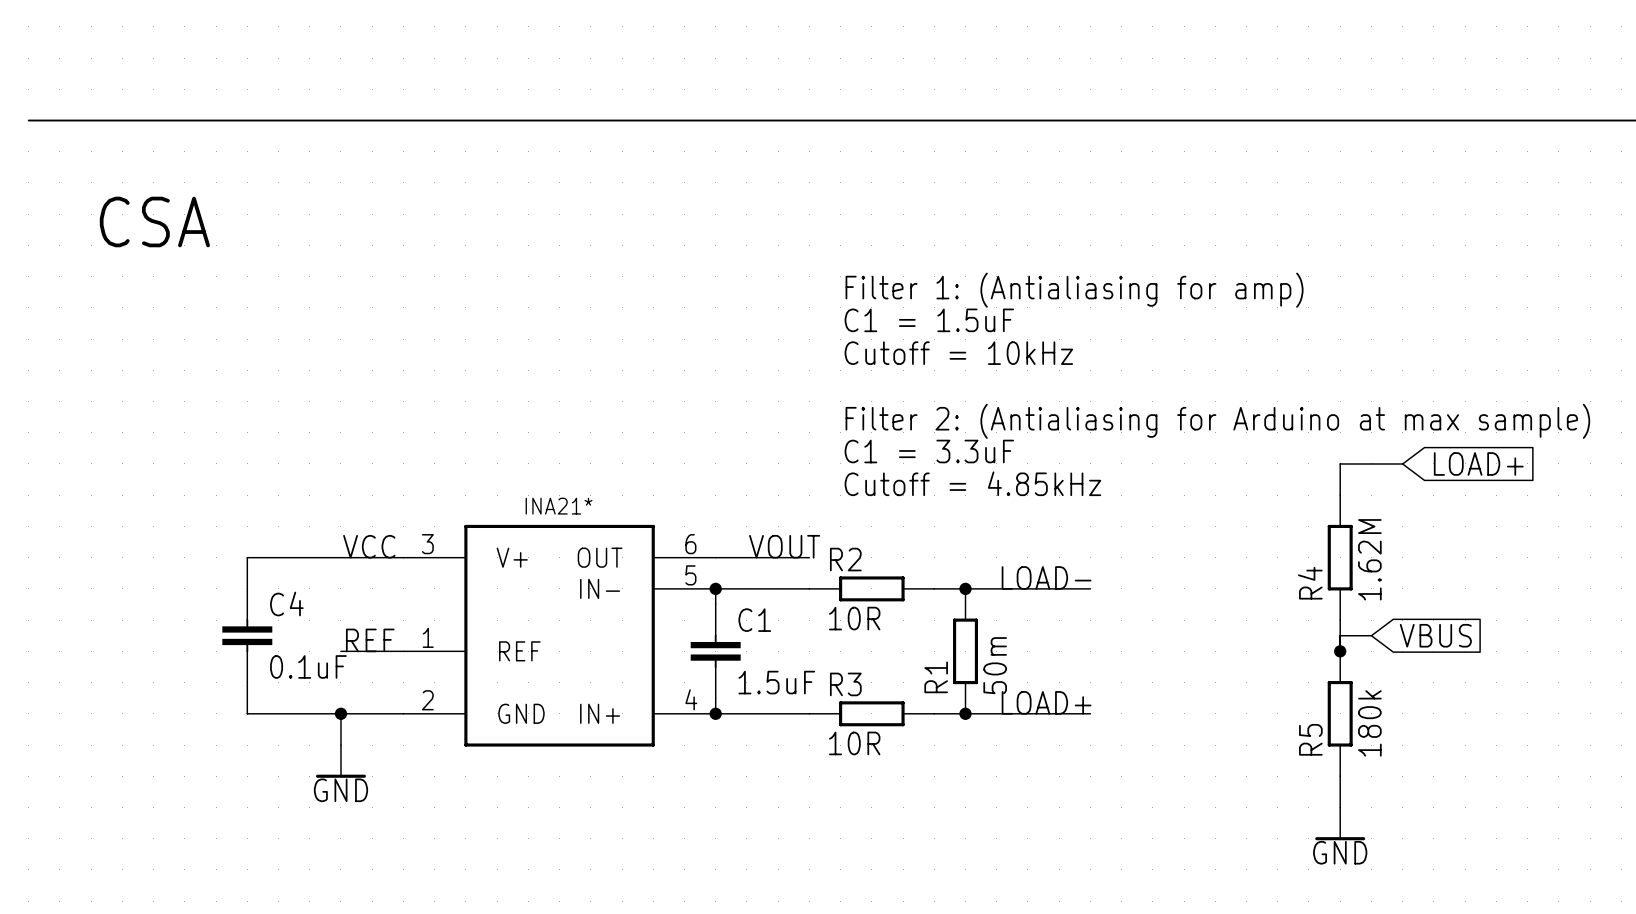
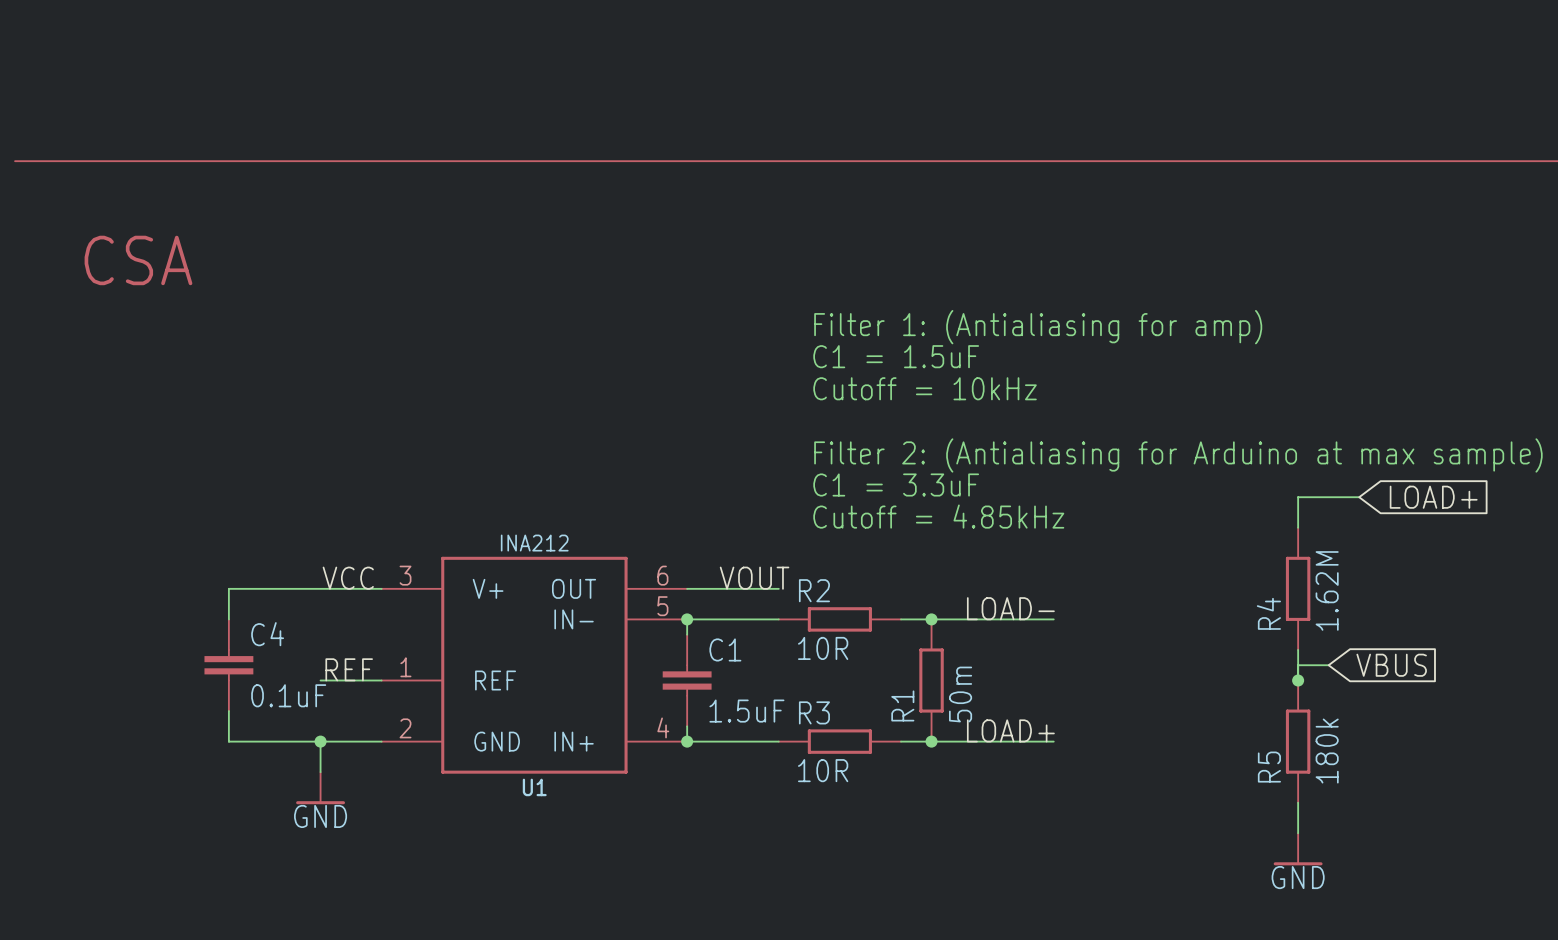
U1 text: INA21* (559, 506) -> none
U1 text: none -> INA212 (534, 543)
U1 name: none -> U1 (534, 787)

